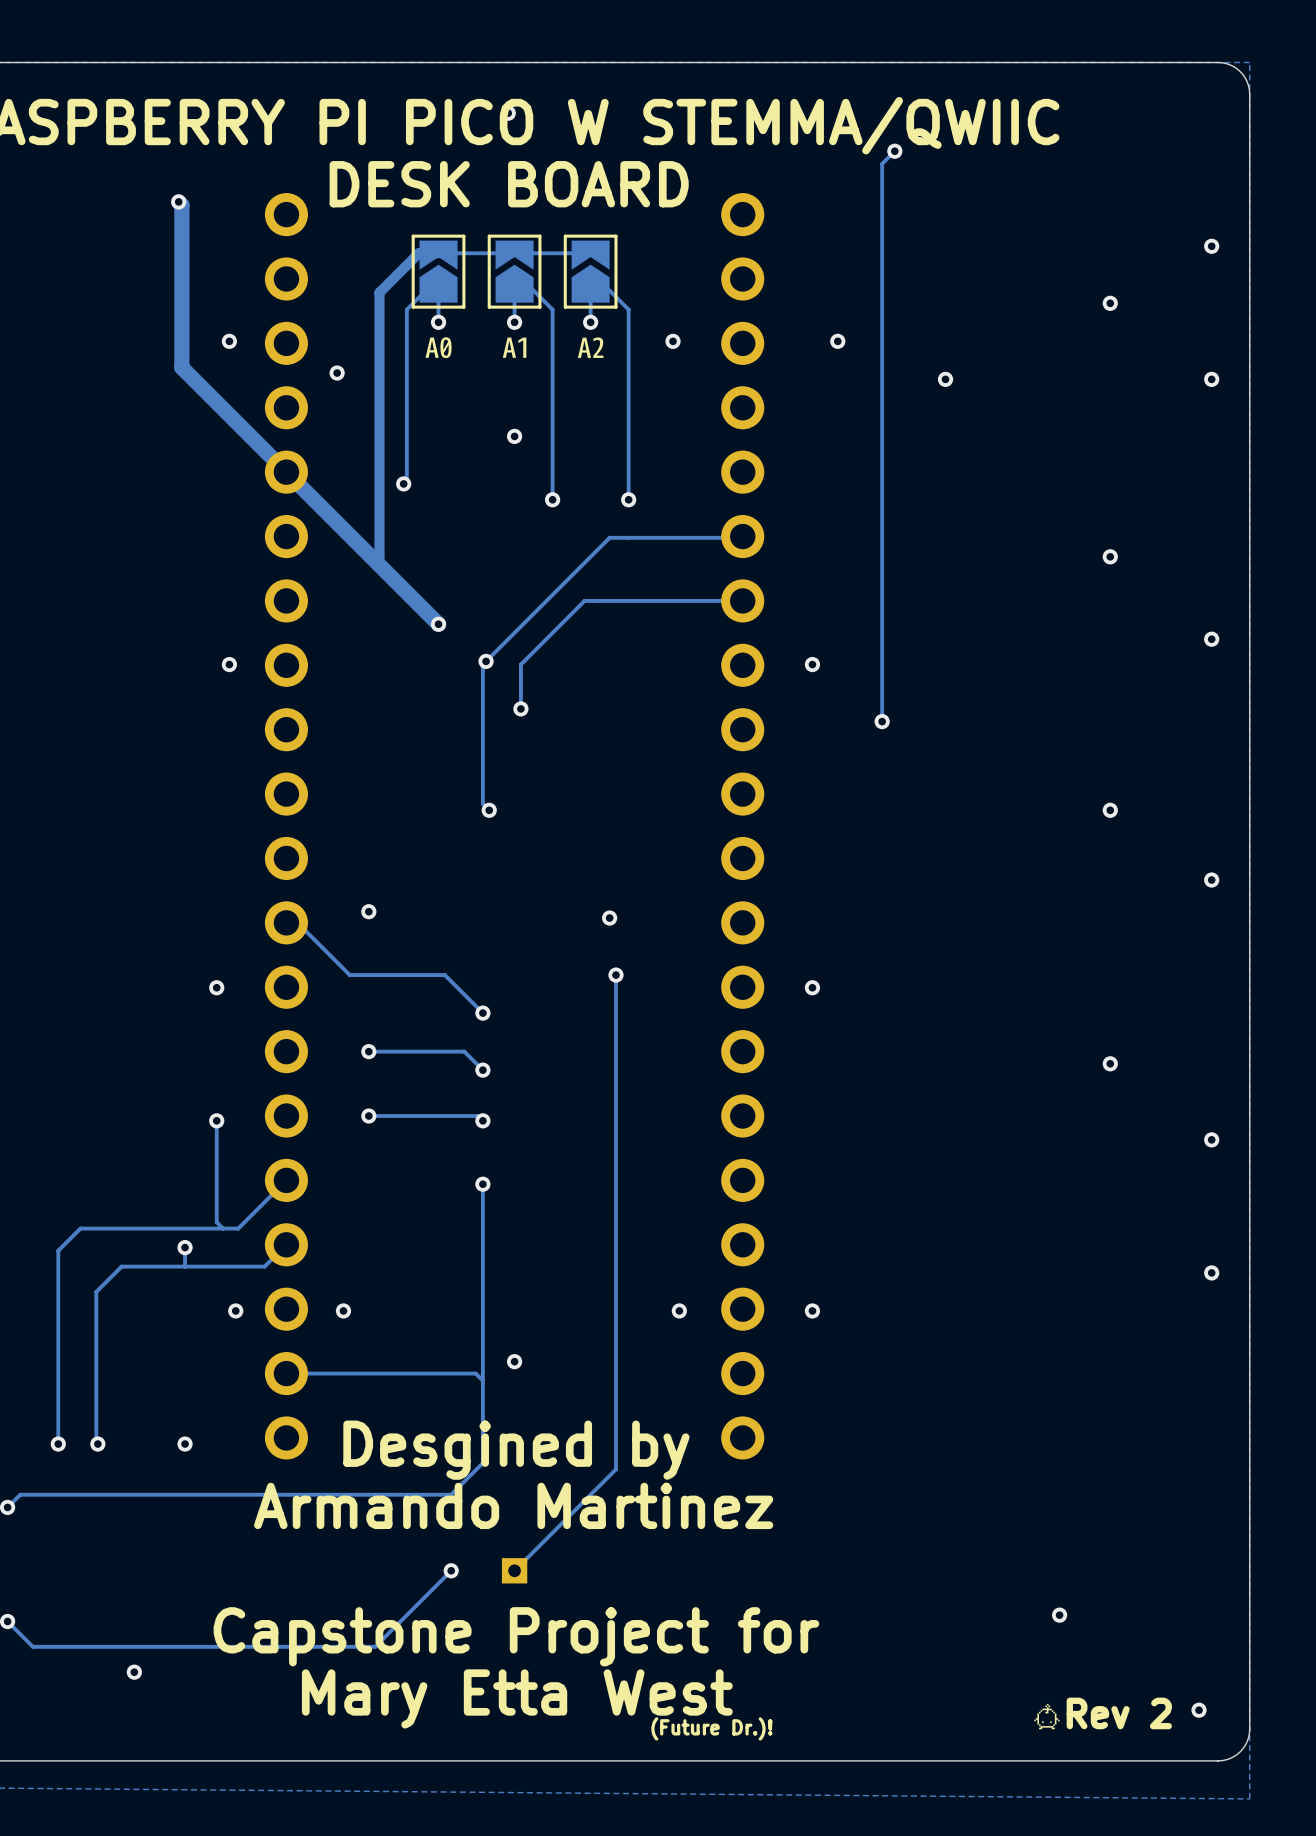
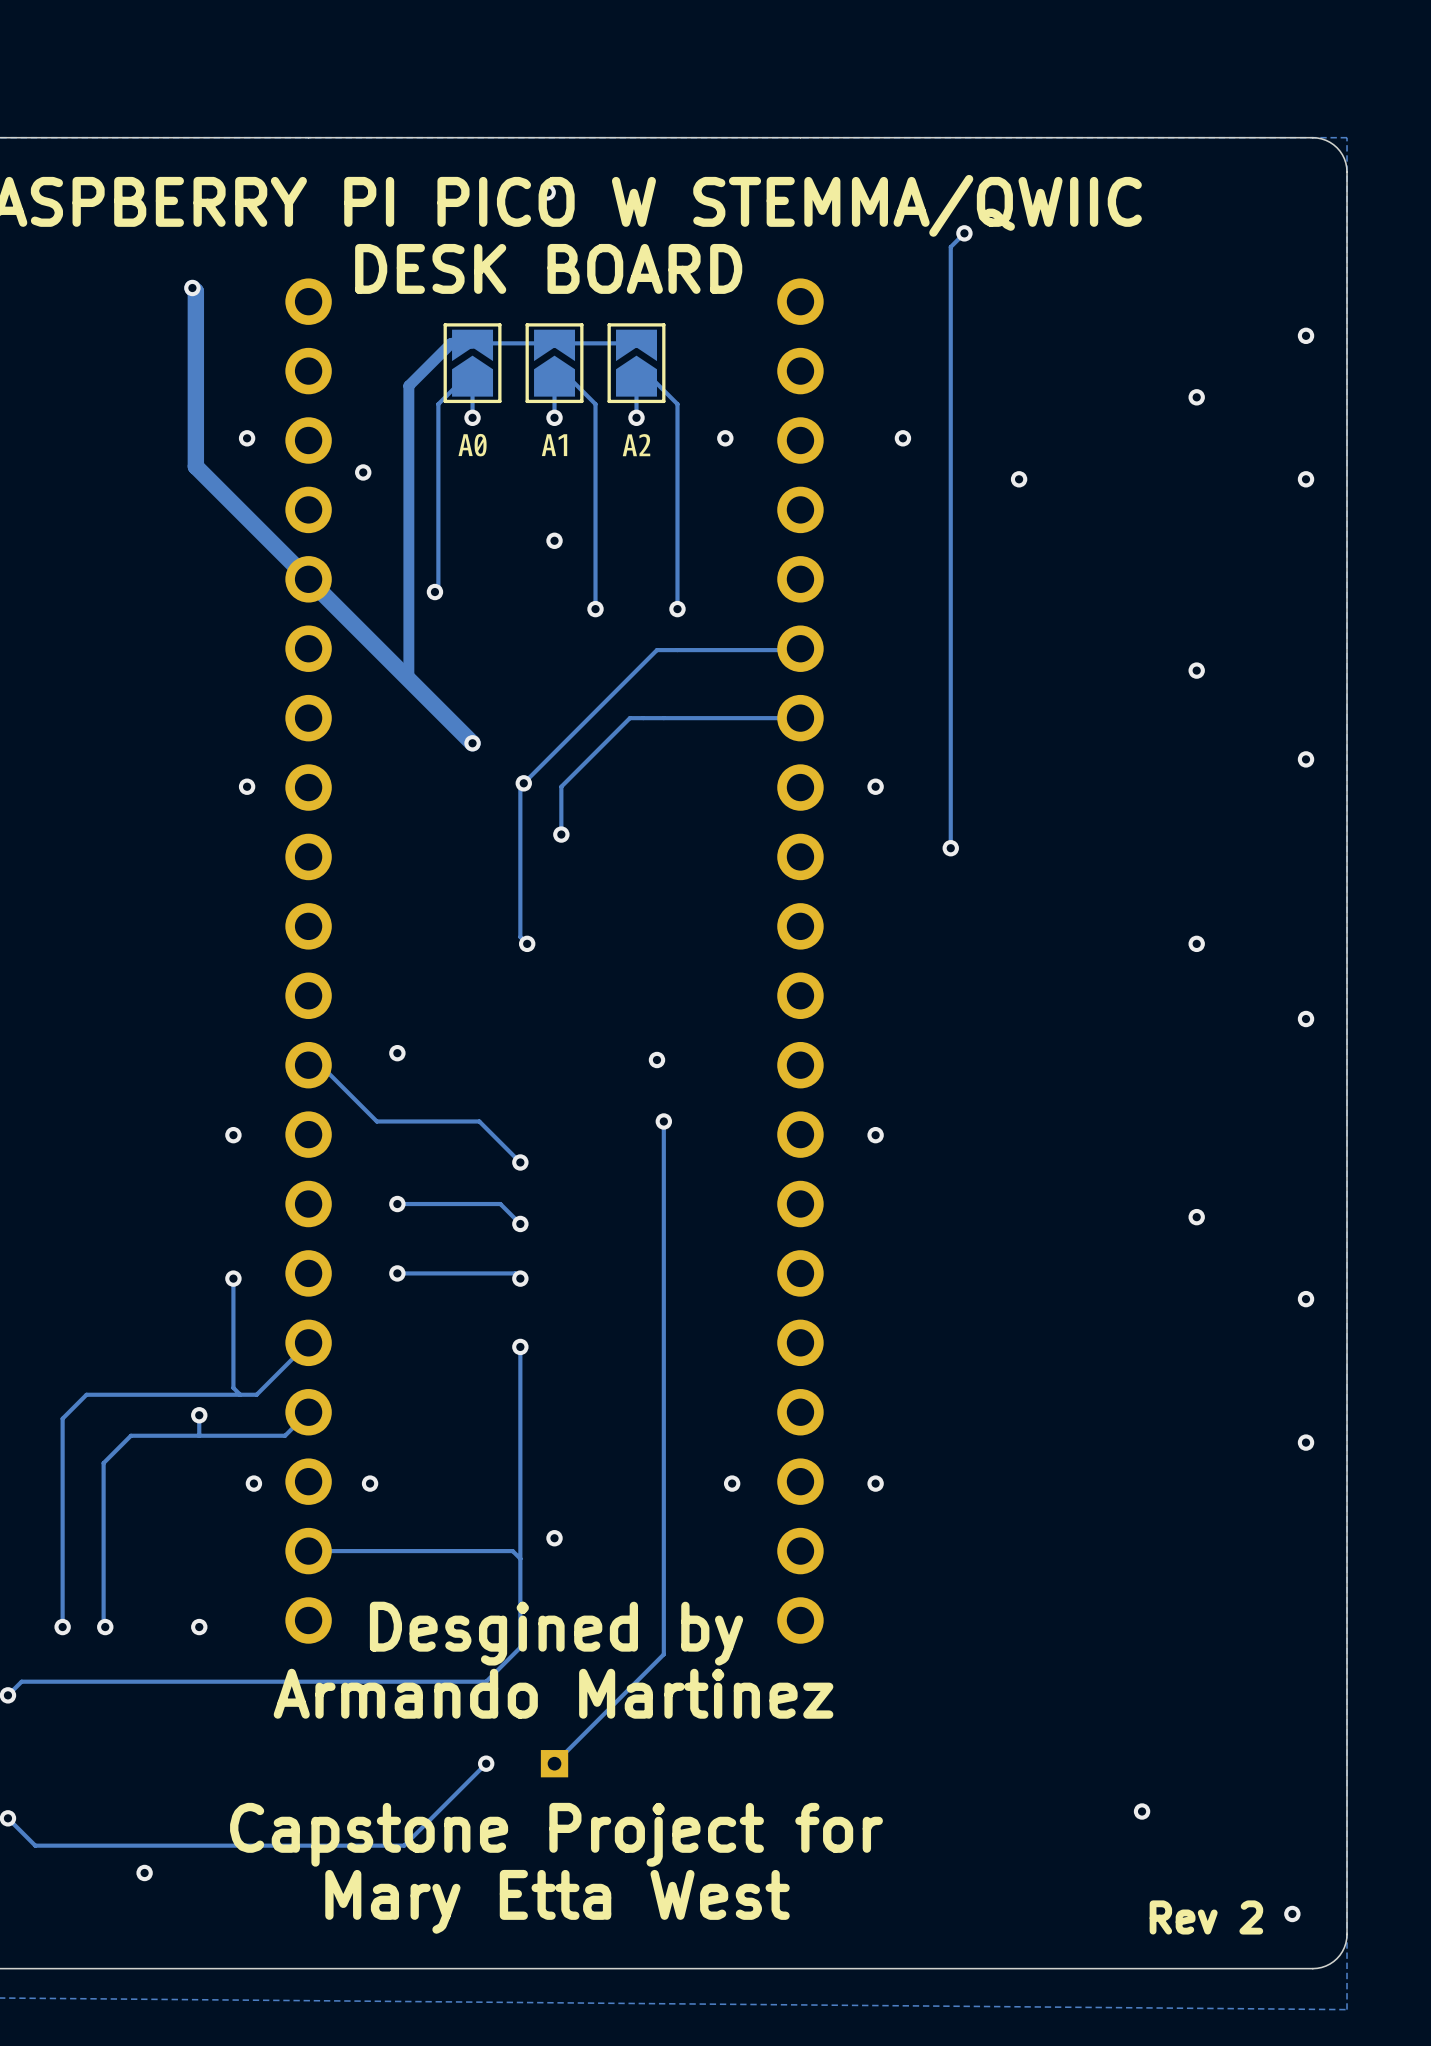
drawing: [1034, 1703, 1060, 1730] -> none
text: (Future Dr.)! (711, 1728) -> none

